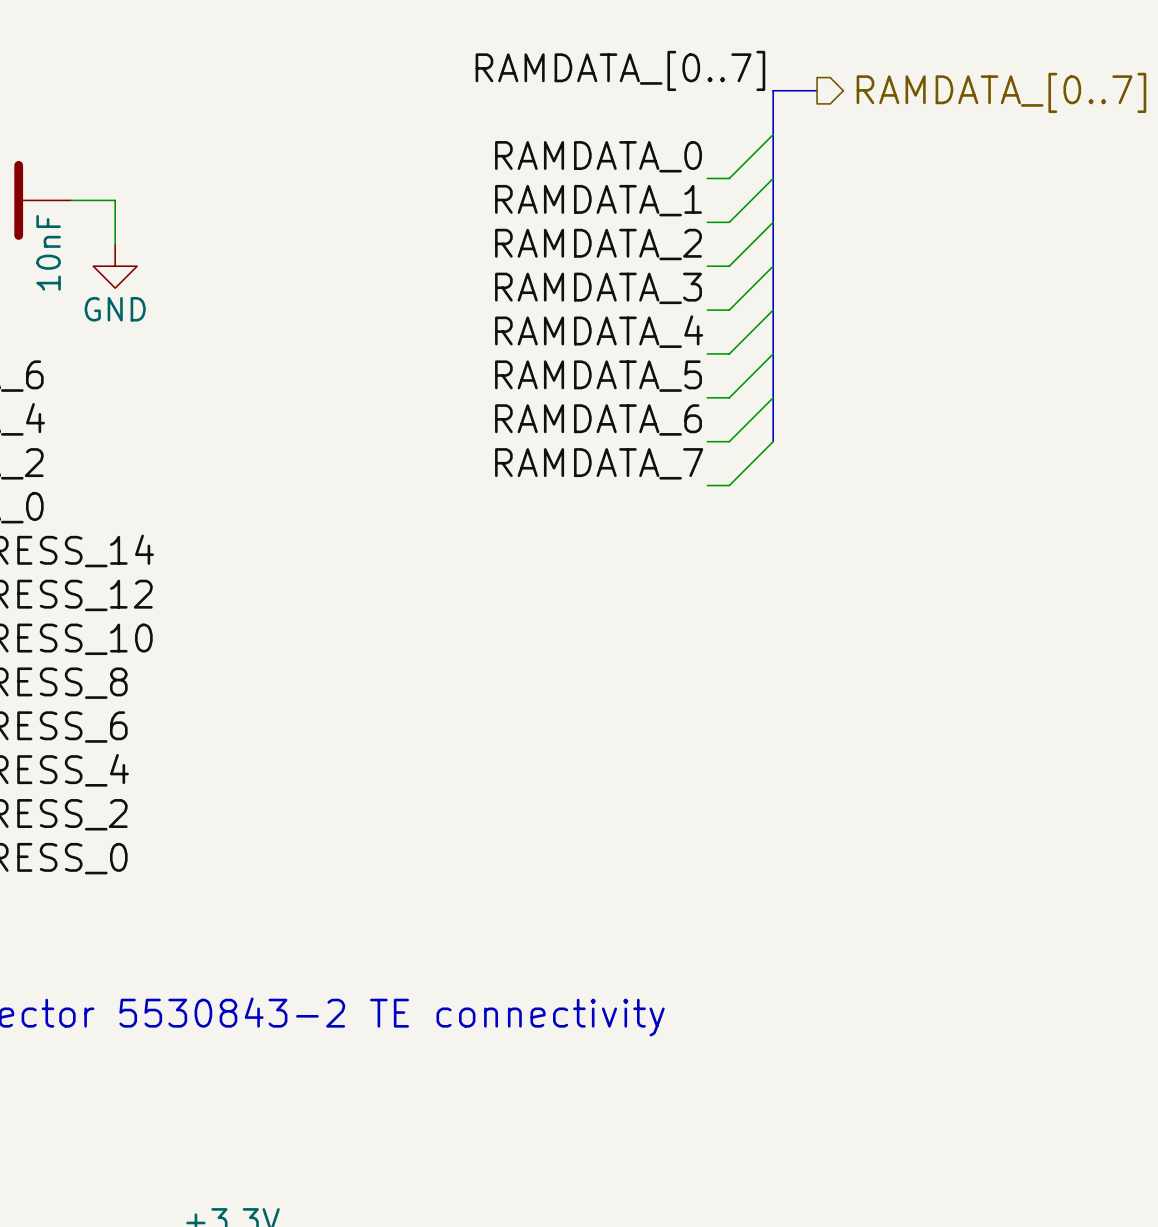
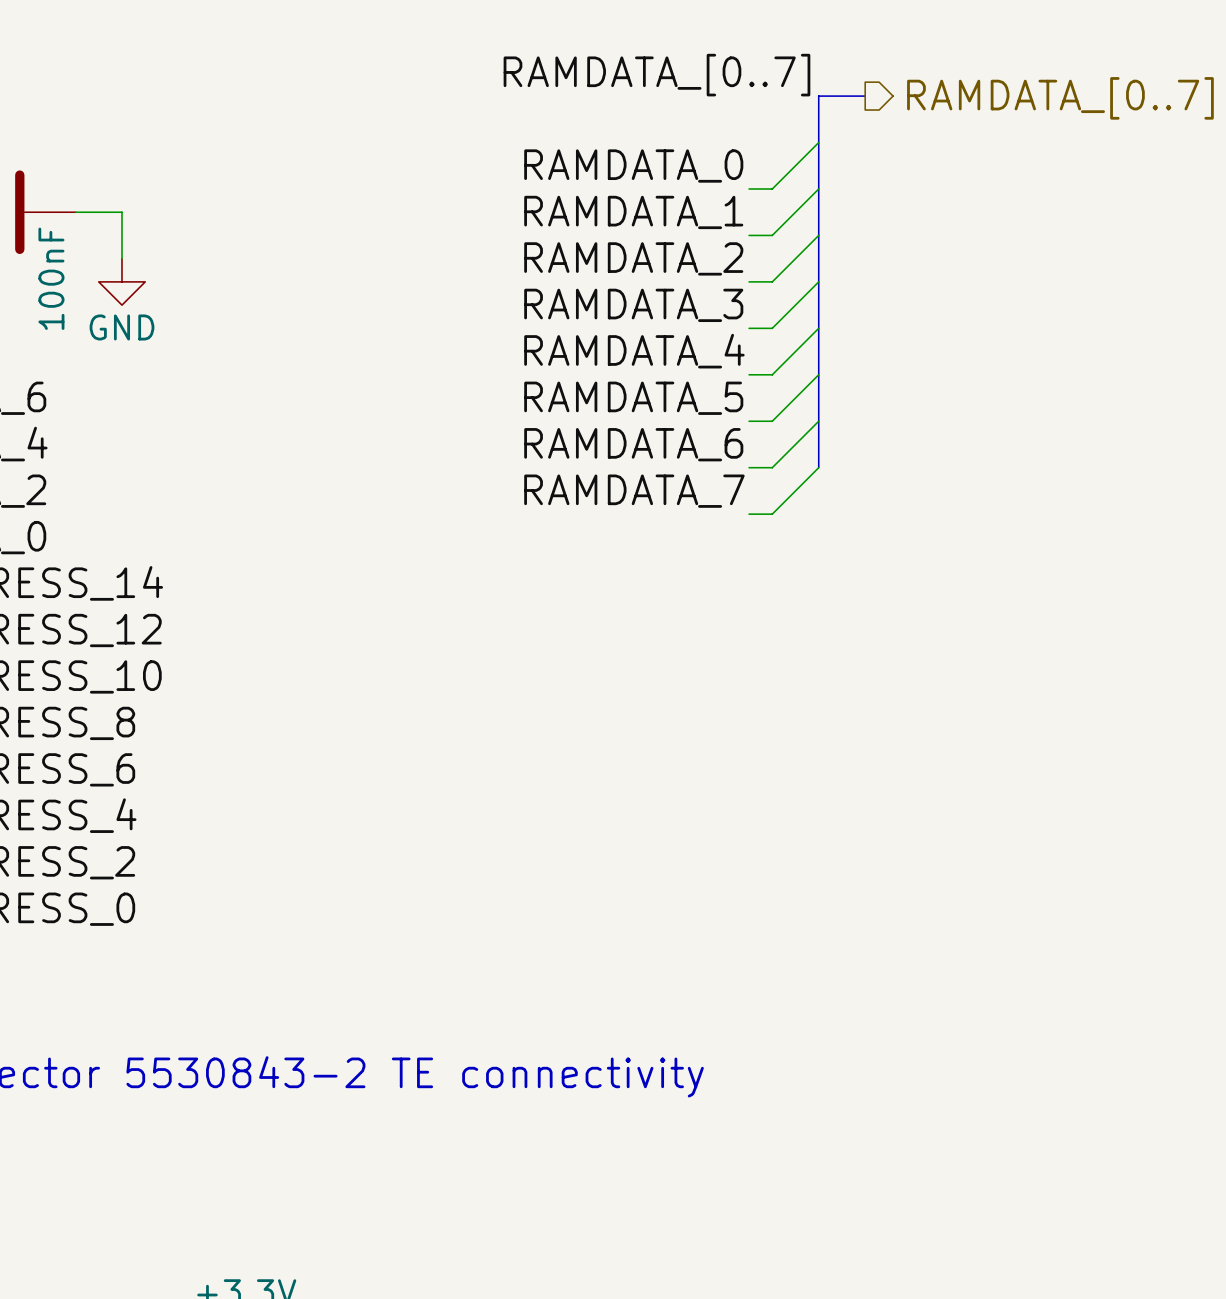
part value: 10nF (48, 252) -> 100nF (51, 278)

